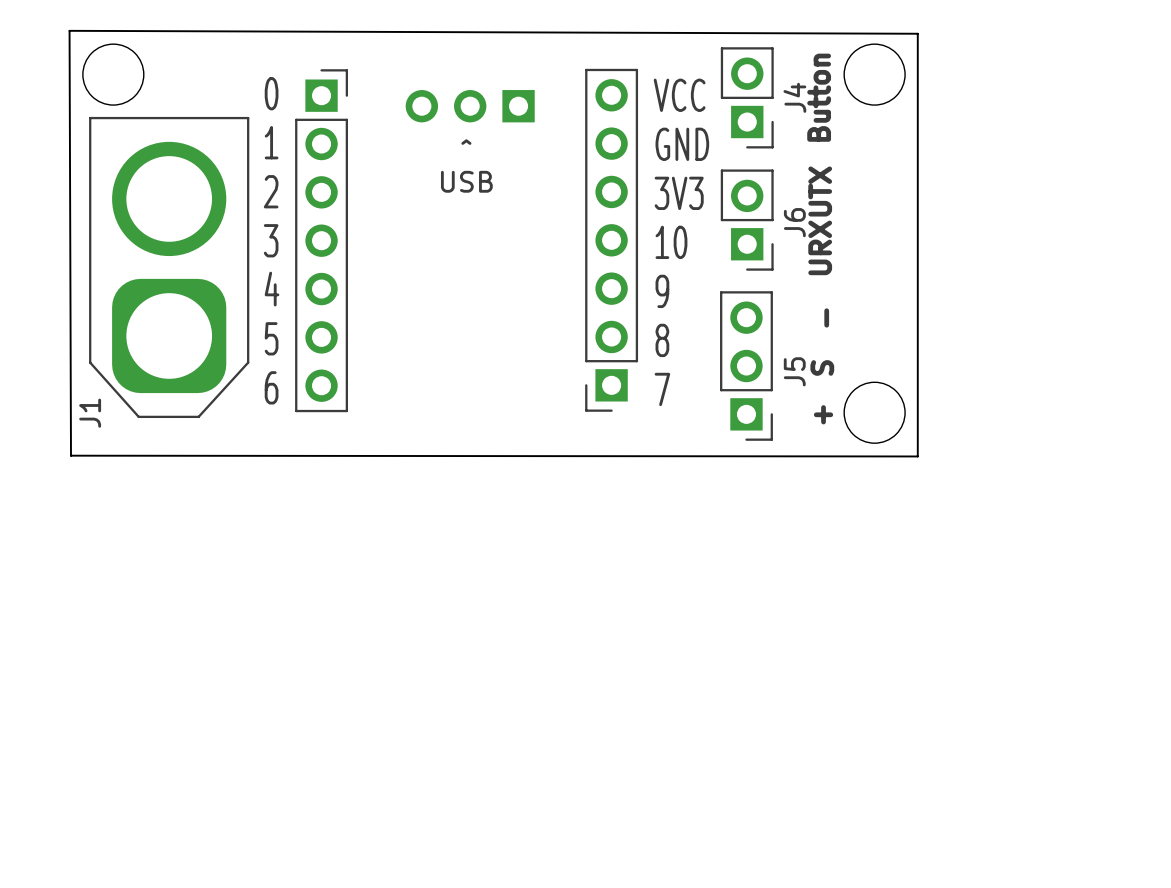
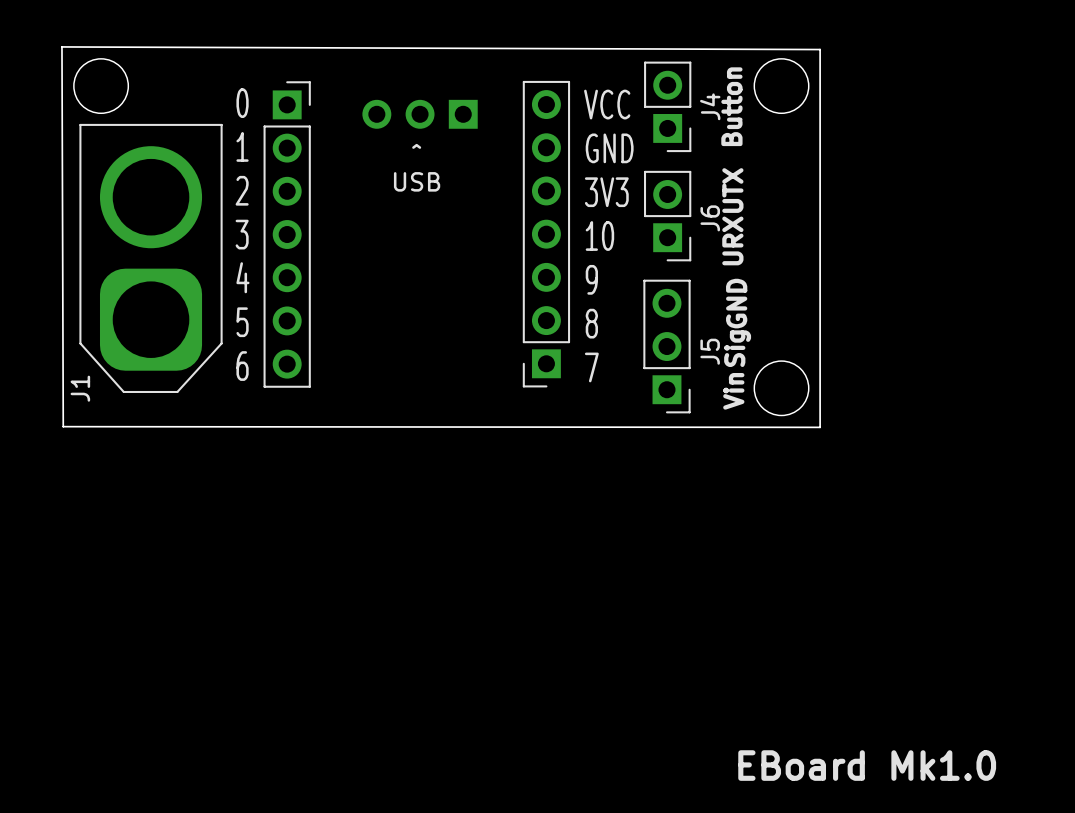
text: - (826, 317) -> GND (736, 303)
text: S (822, 367) -> Sig (737, 348)
text: + (823, 414) -> Vin (733, 391)
text: none -> EBoard Mk1.0 (867, 765)

